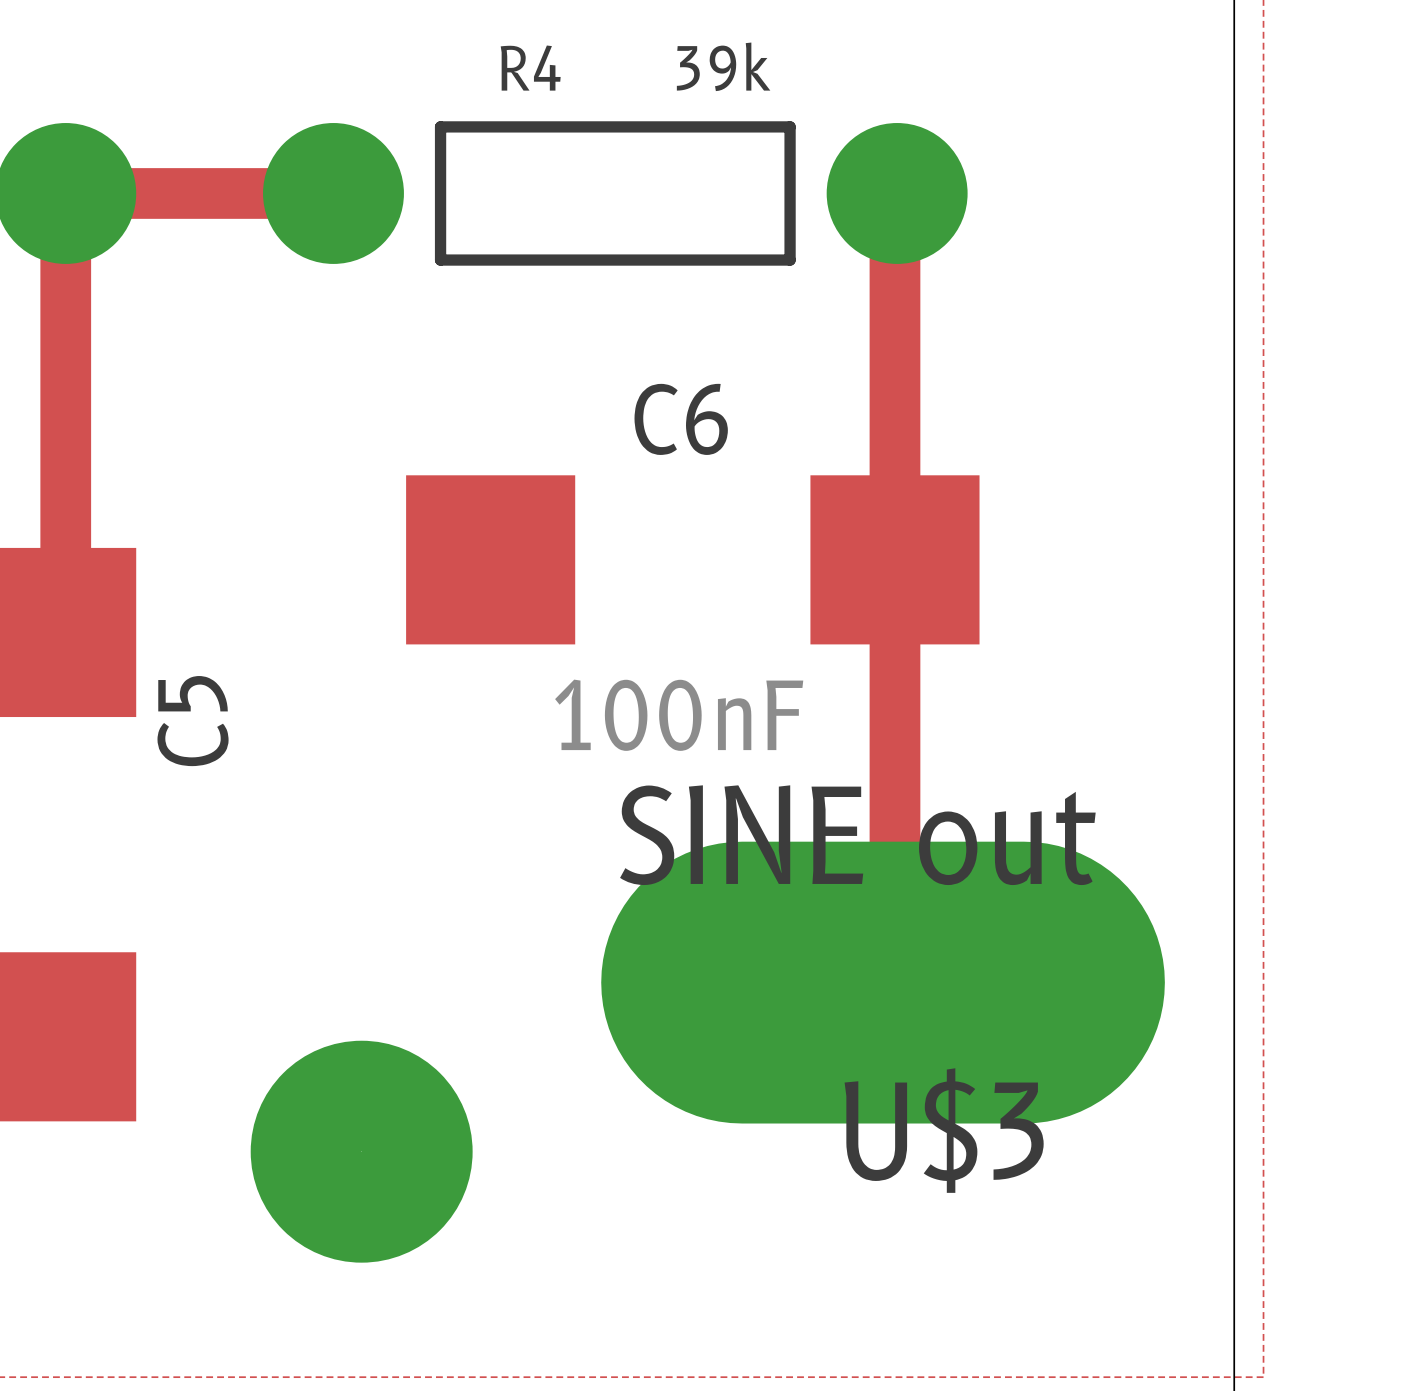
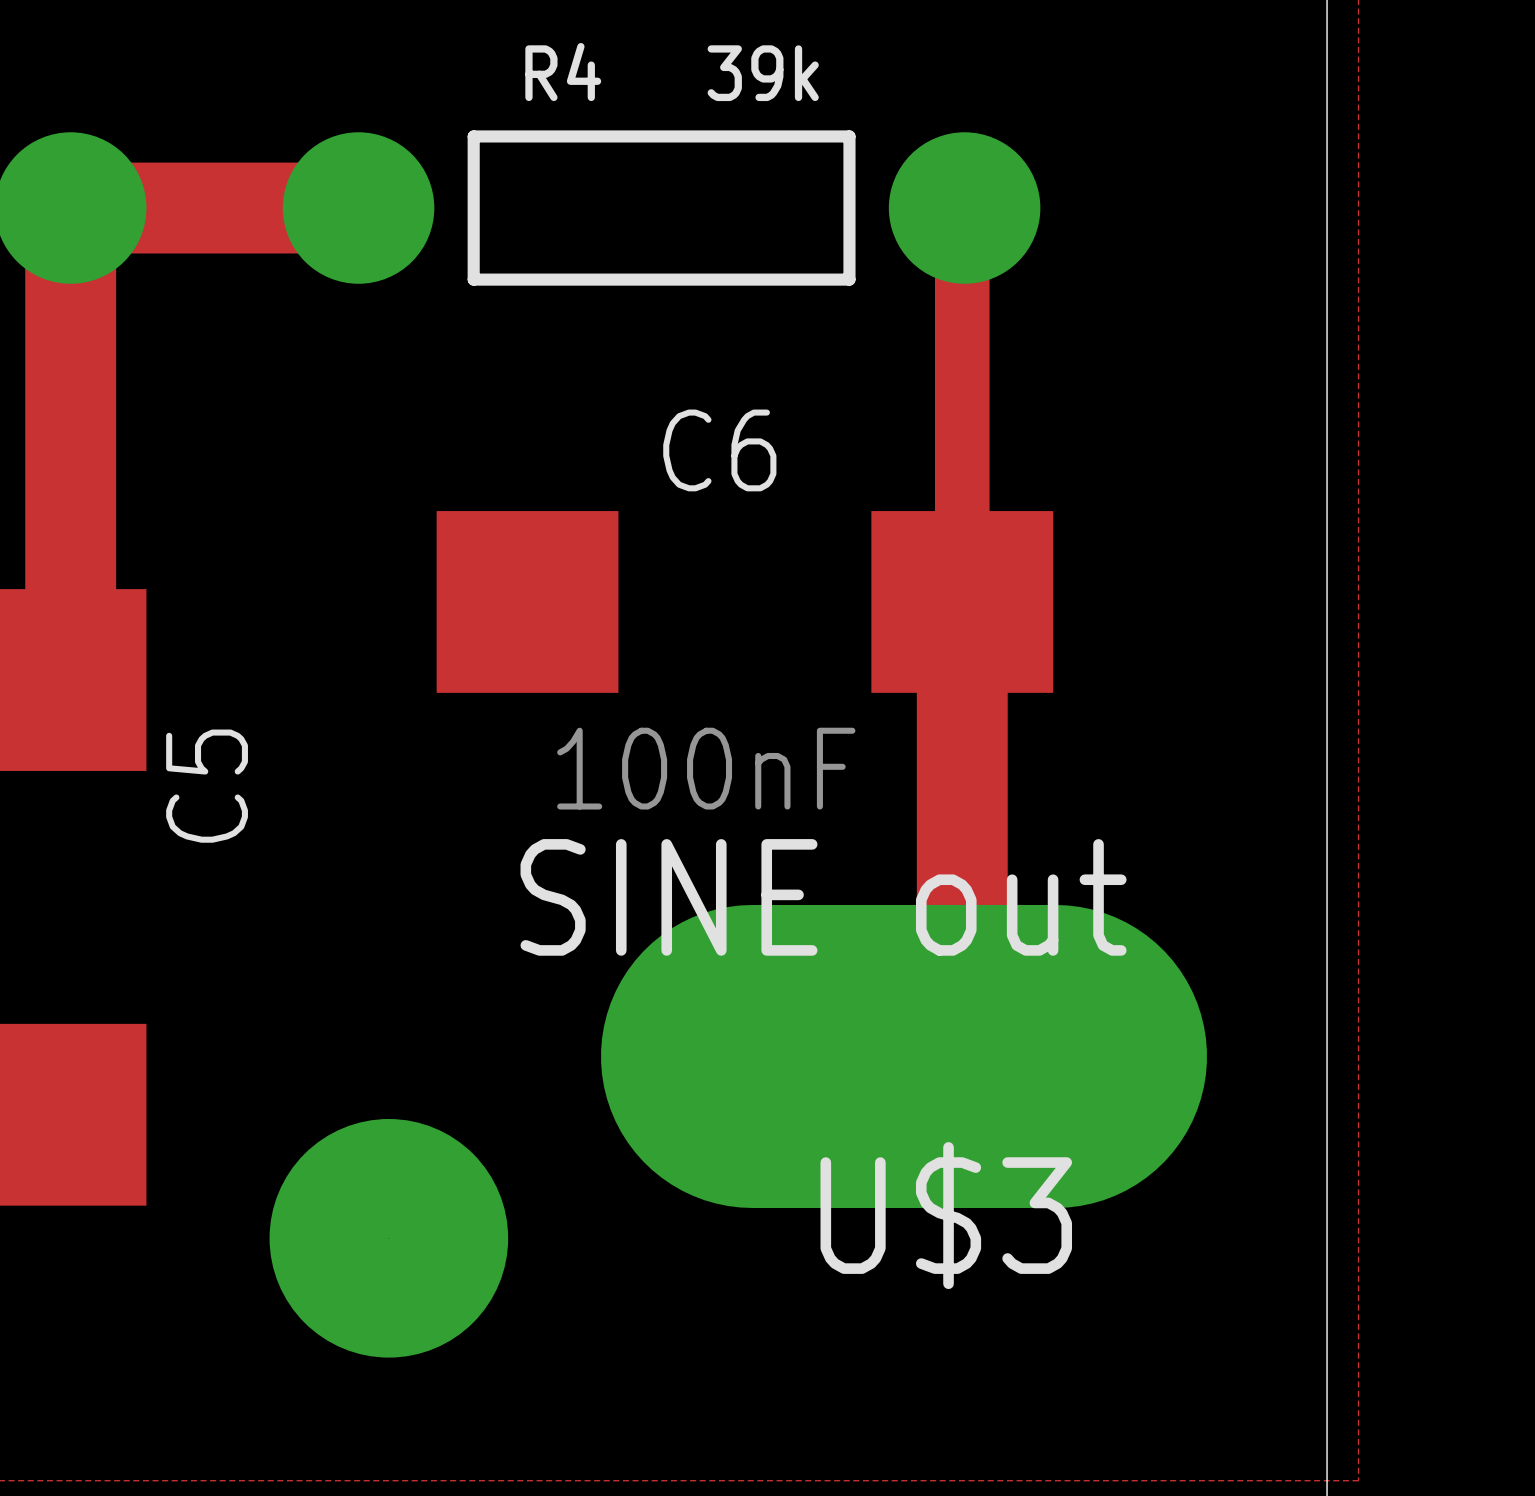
top track width: thin (333, 193) (65, 193) (65, 618) -> thick (358, 208) (70, 208) (70, 664)
top track width: thin (894, 559) (894, 928) -> thick (962, 601) (962, 998)
U$3 position: (883, 982) -> (903, 1056)

